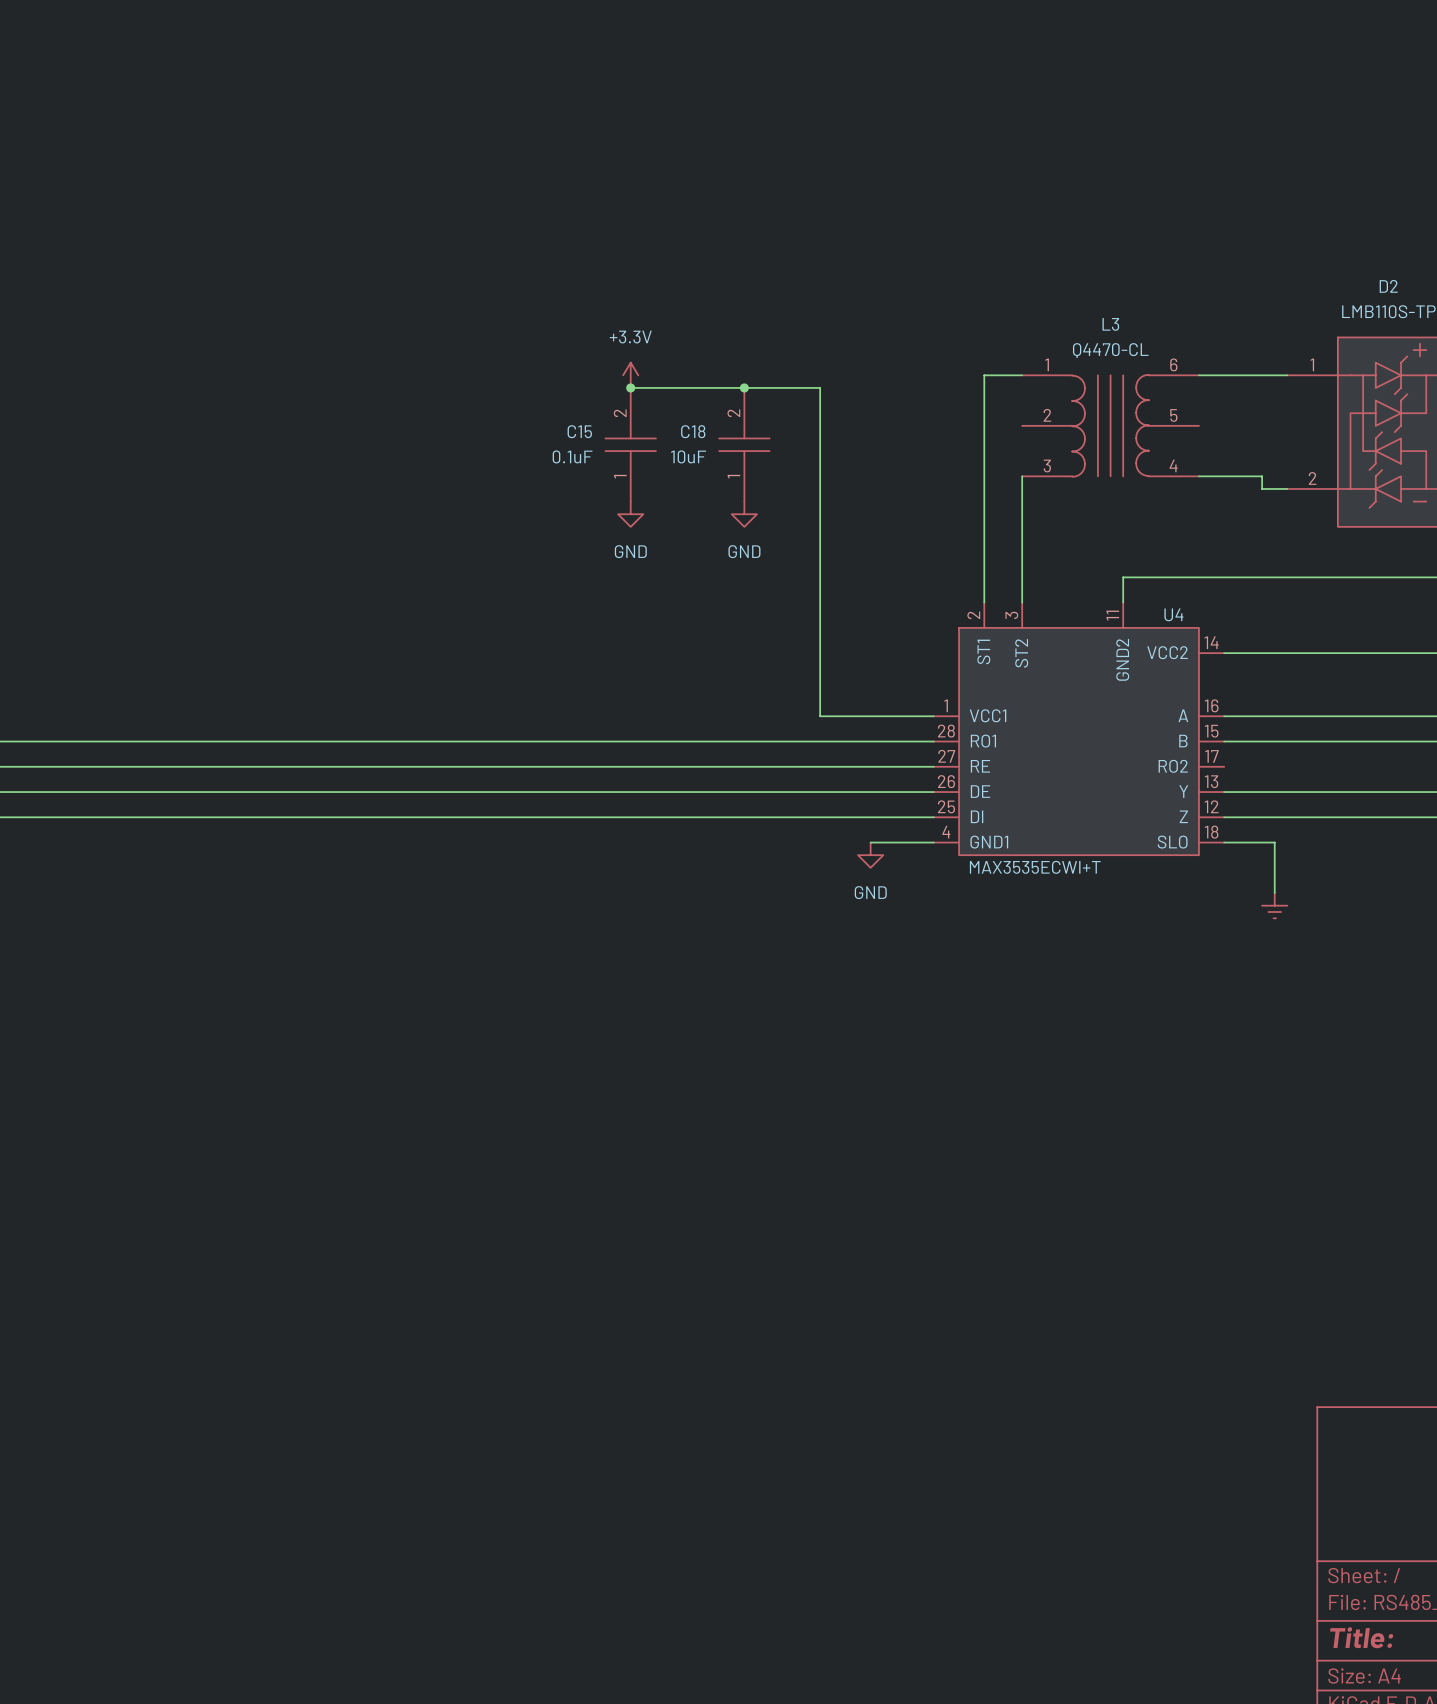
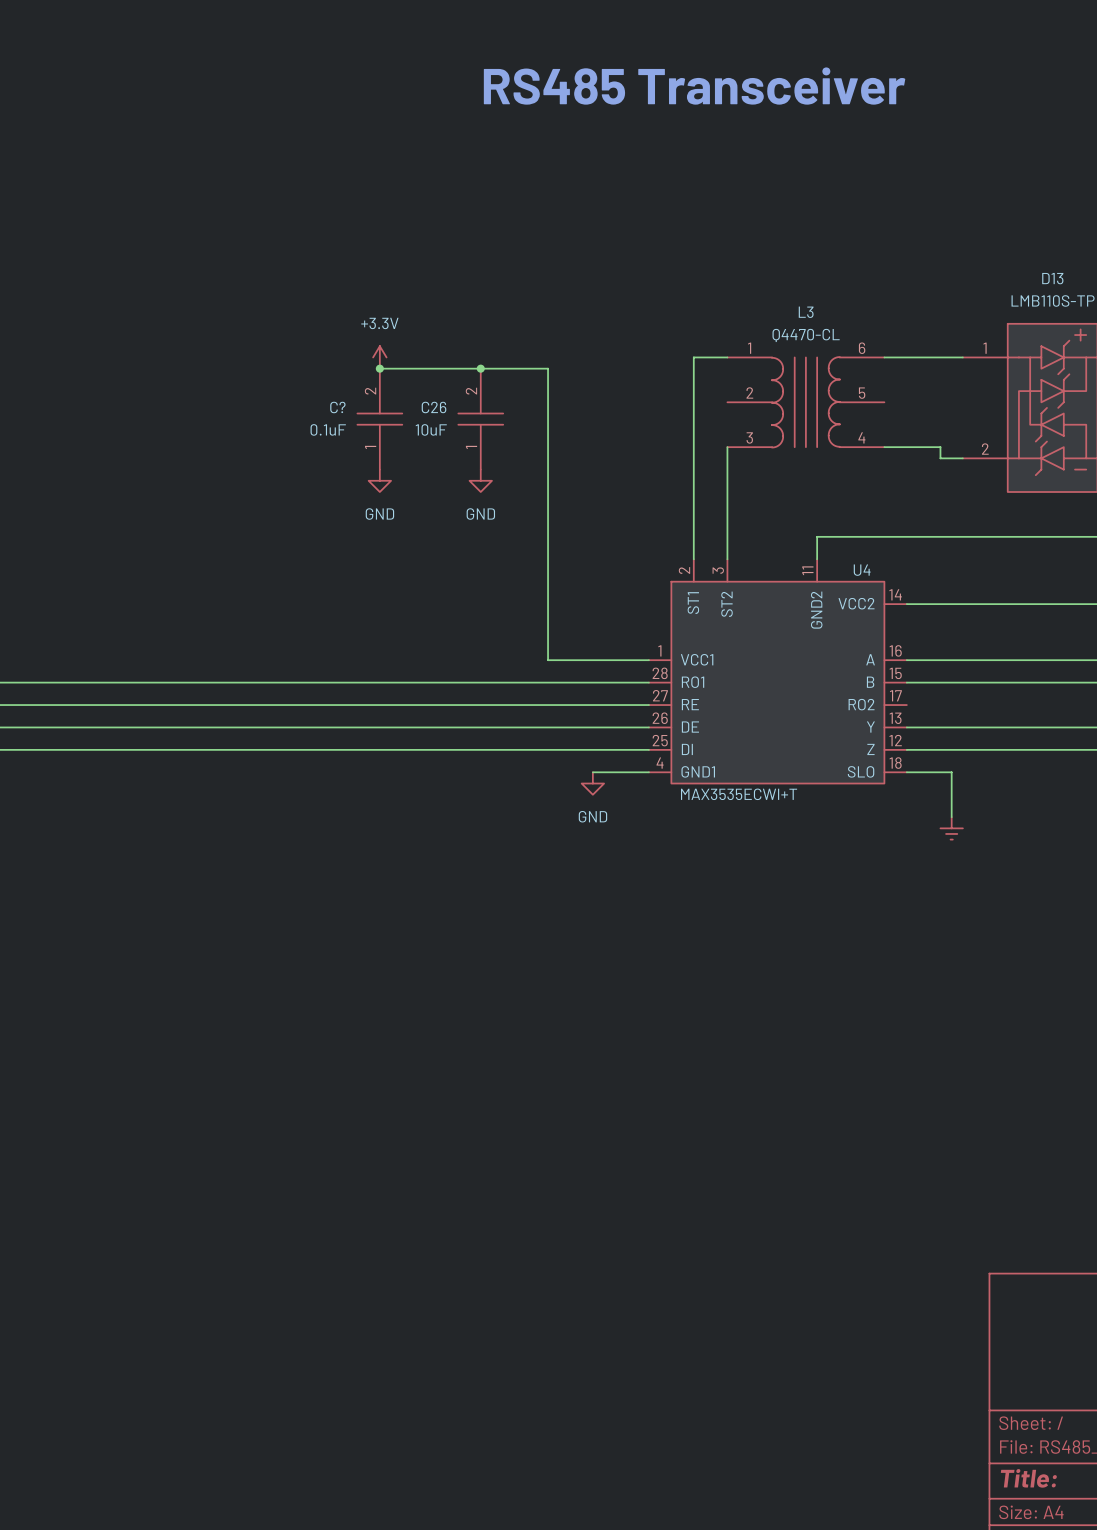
text: none -> RS485 Transceiver (694, 86)
D2 name: D2 (1388, 286) -> D13 (1052, 278)
C15 name: C15 (579, 431) -> C? (337, 407)
C18 name: C18 (693, 431) -> C26 (434, 407)

